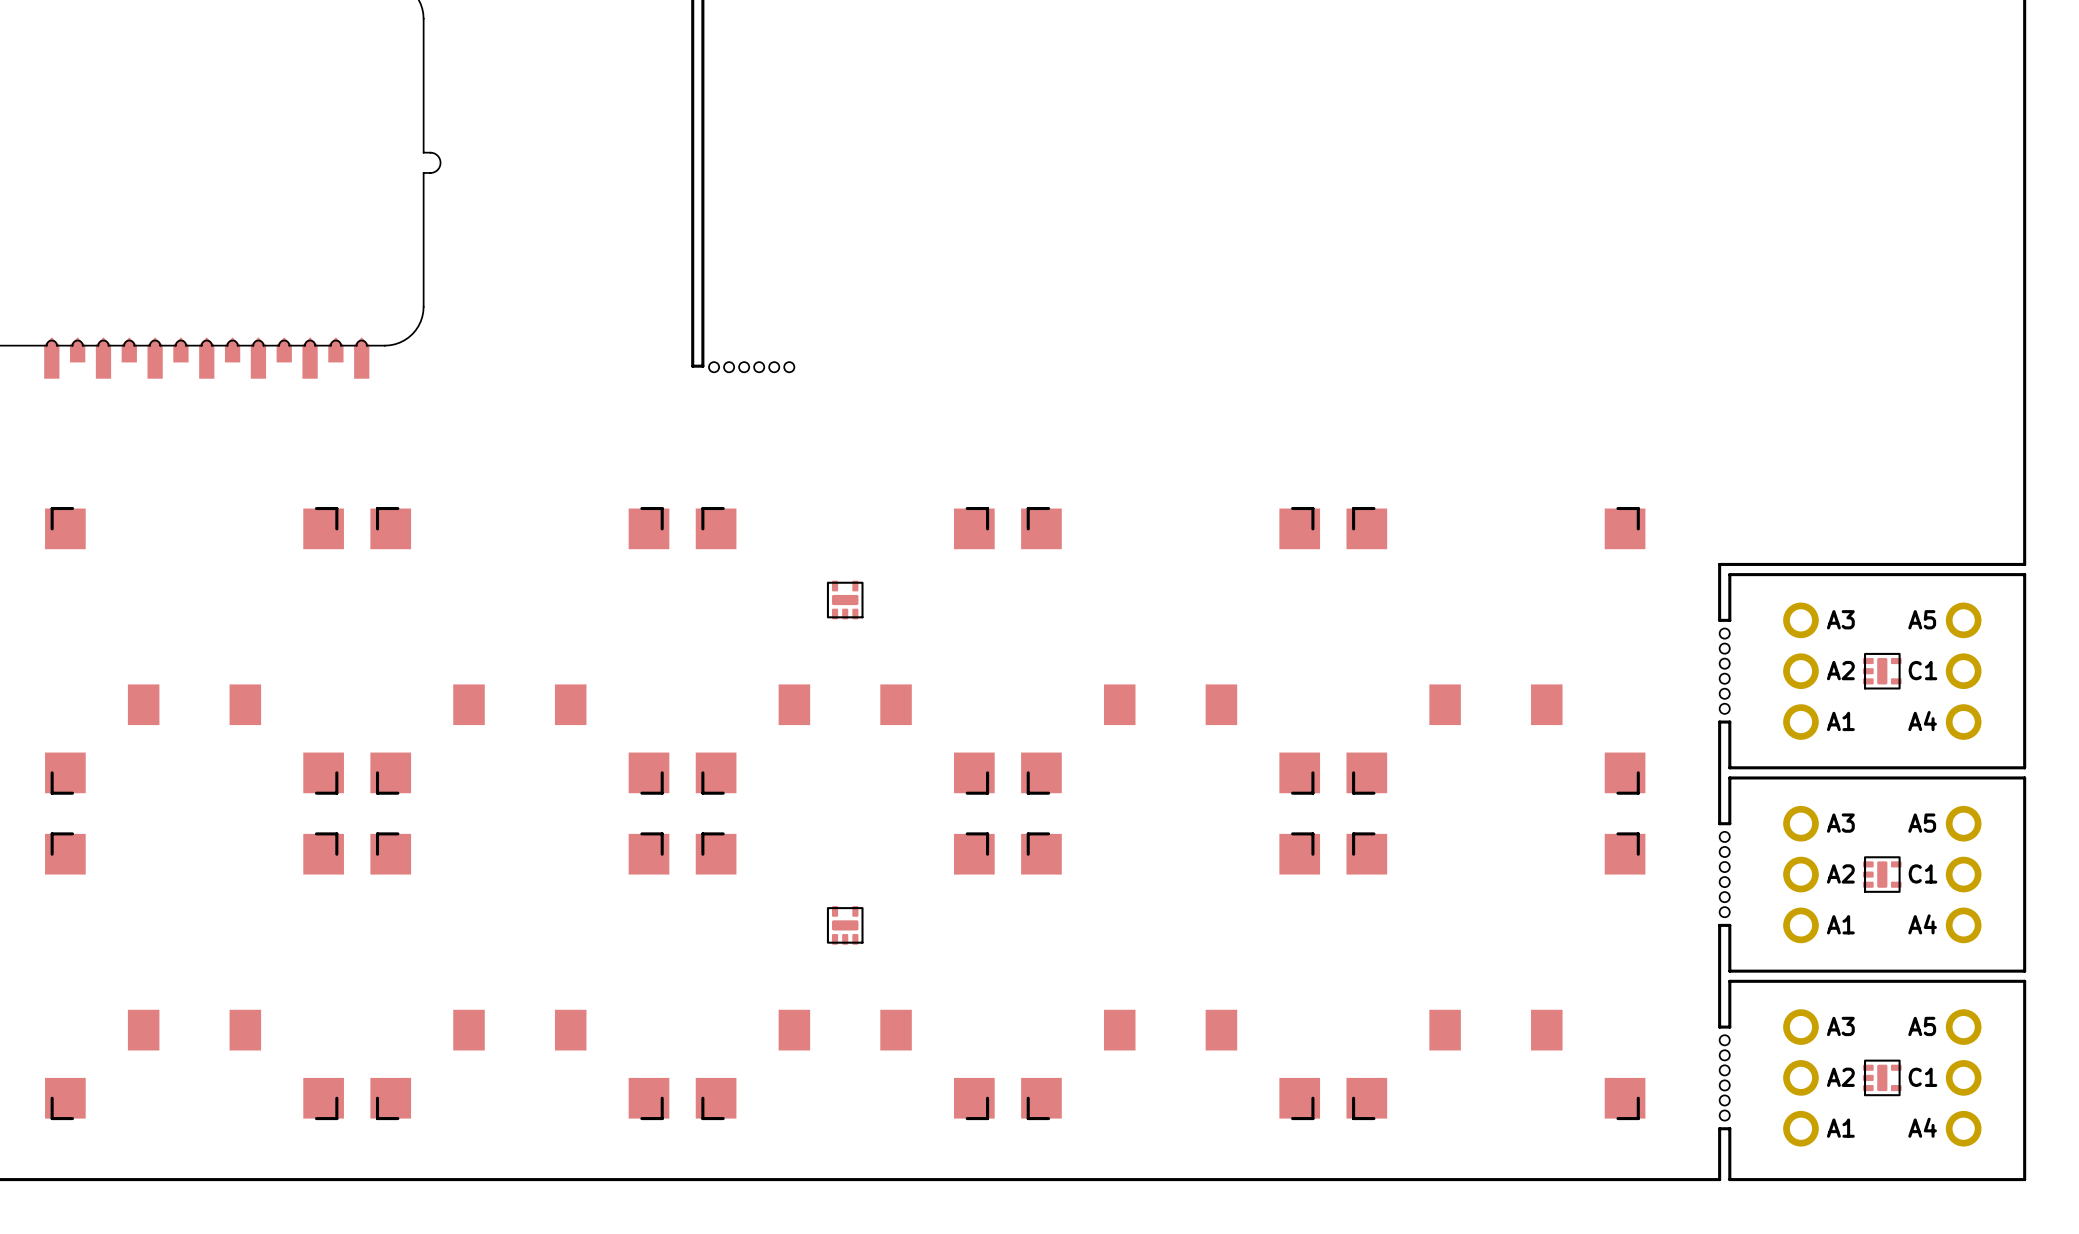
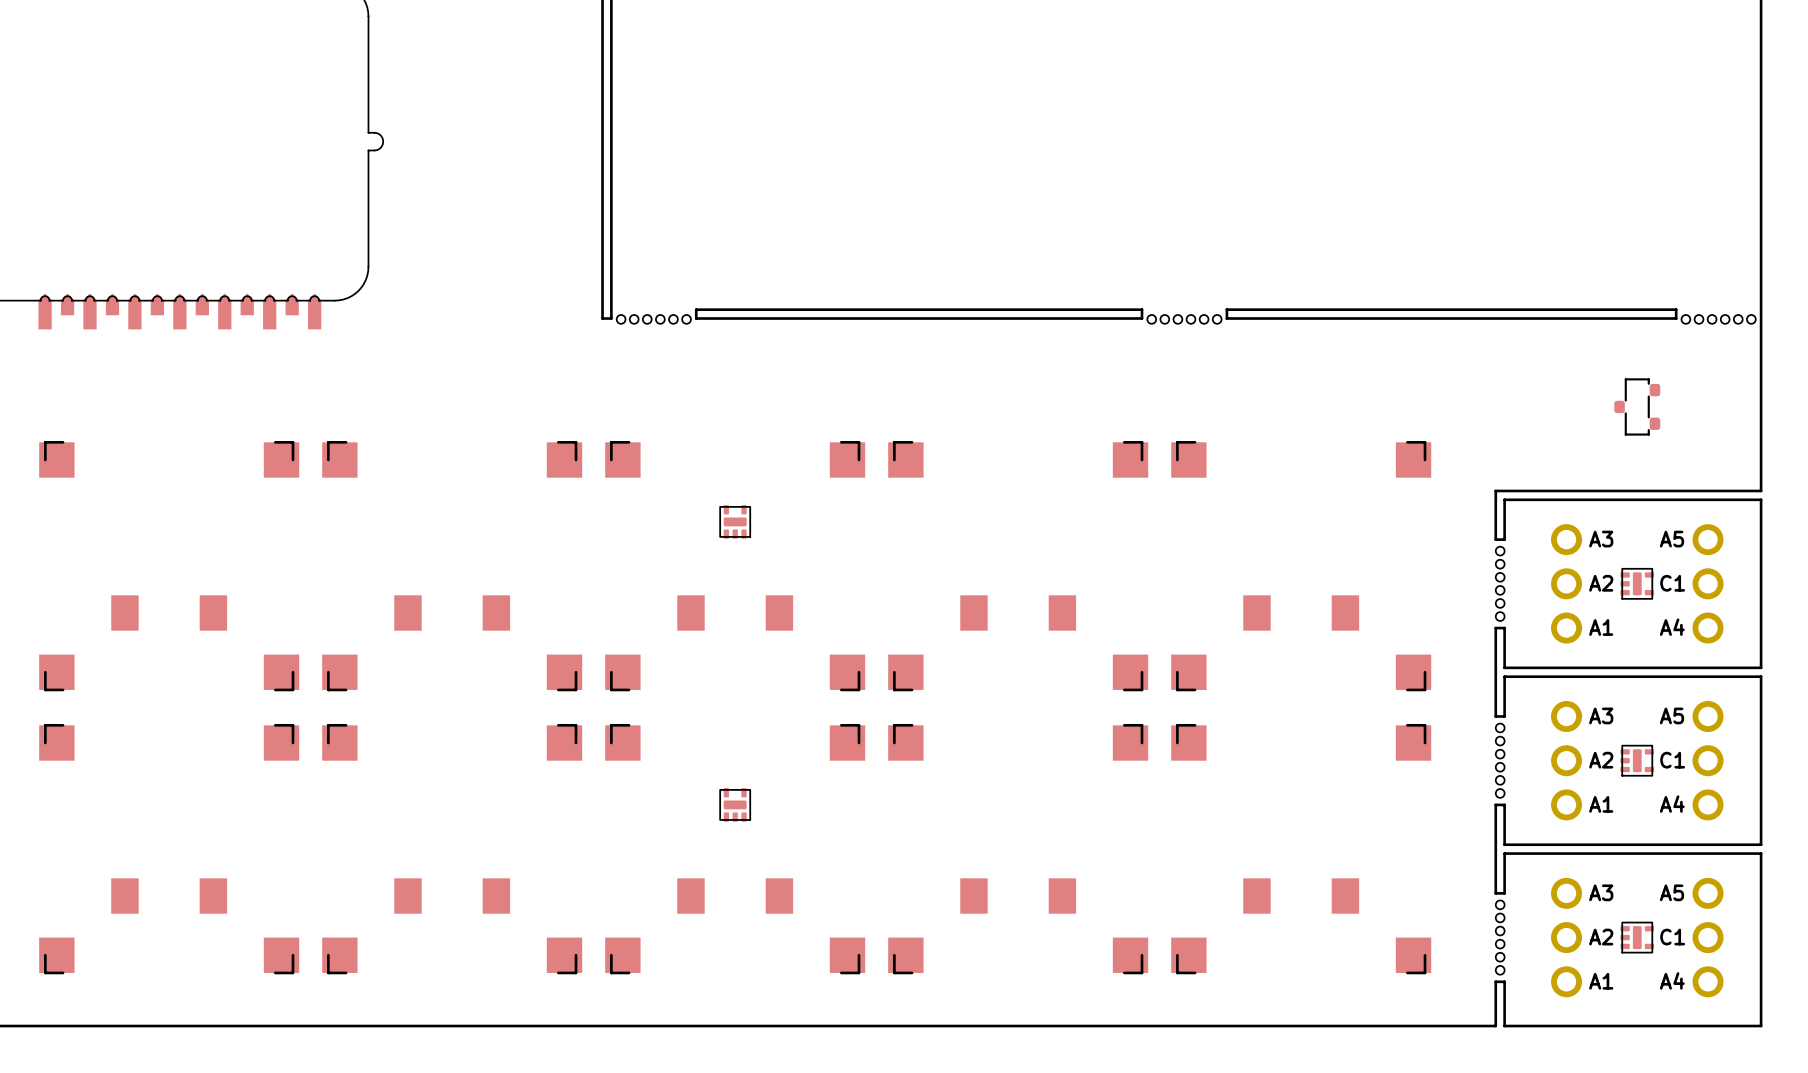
board edge: none -> (696, 309) (696, 318) (1142, 318) (1142, 309) (696, 309)
board edge: none -> (1226, 309) (1676, 309) (1676, 318) (1226, 318) (1226, 309)
part: none -> (1184, 319)
part: none -> (1718, 319)
part: none -> (1637, 406)

